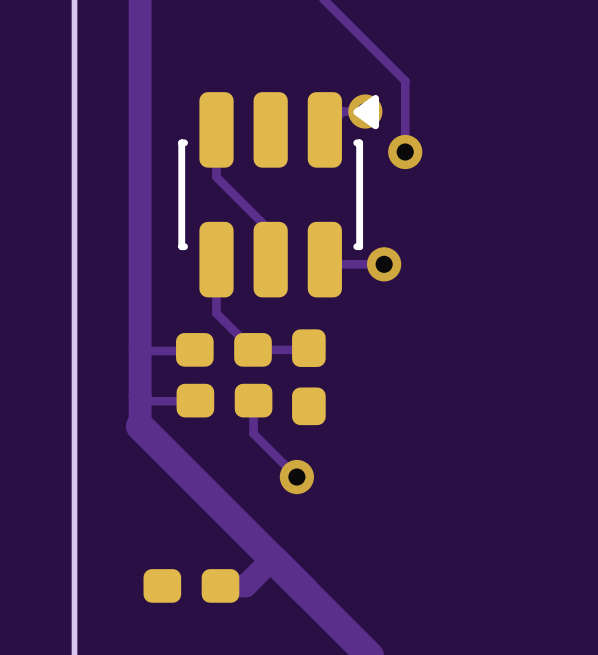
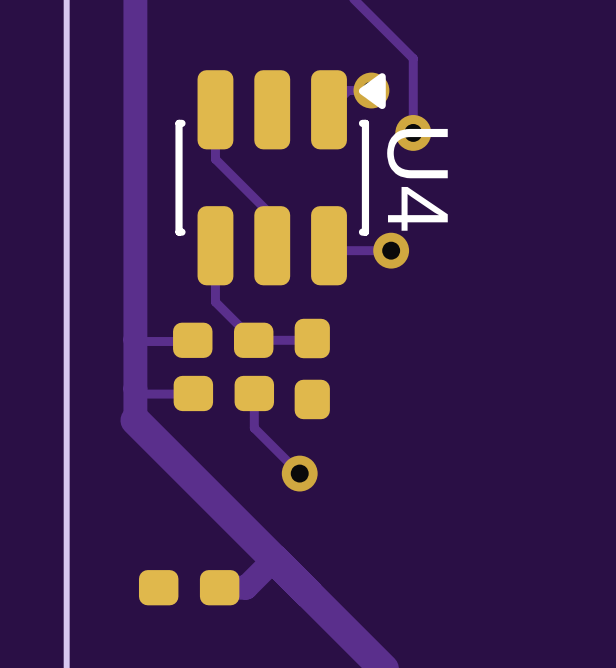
U4 name: none -> U4 (417, 179)

